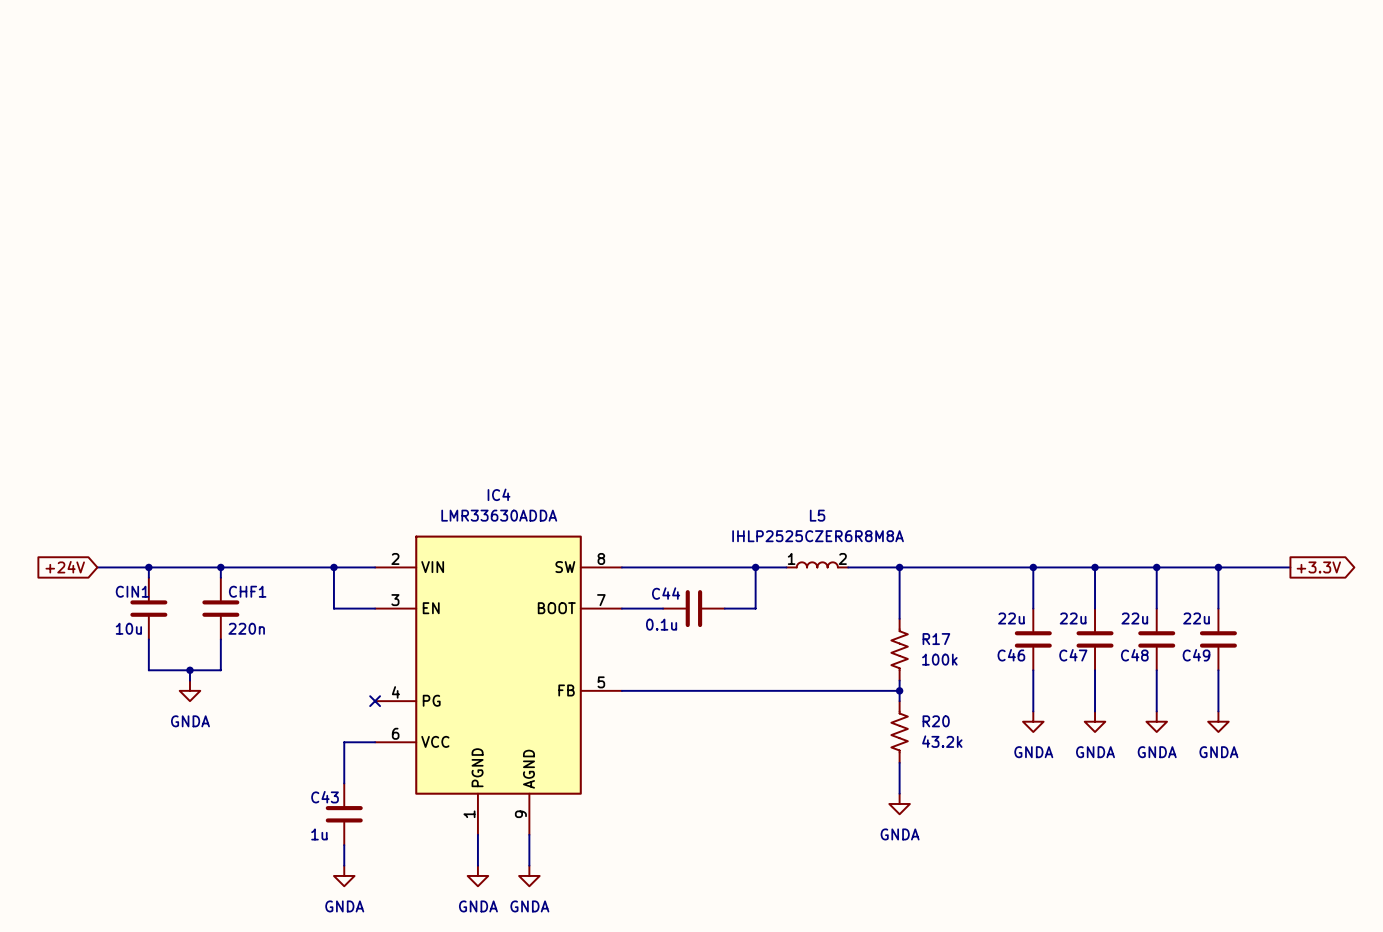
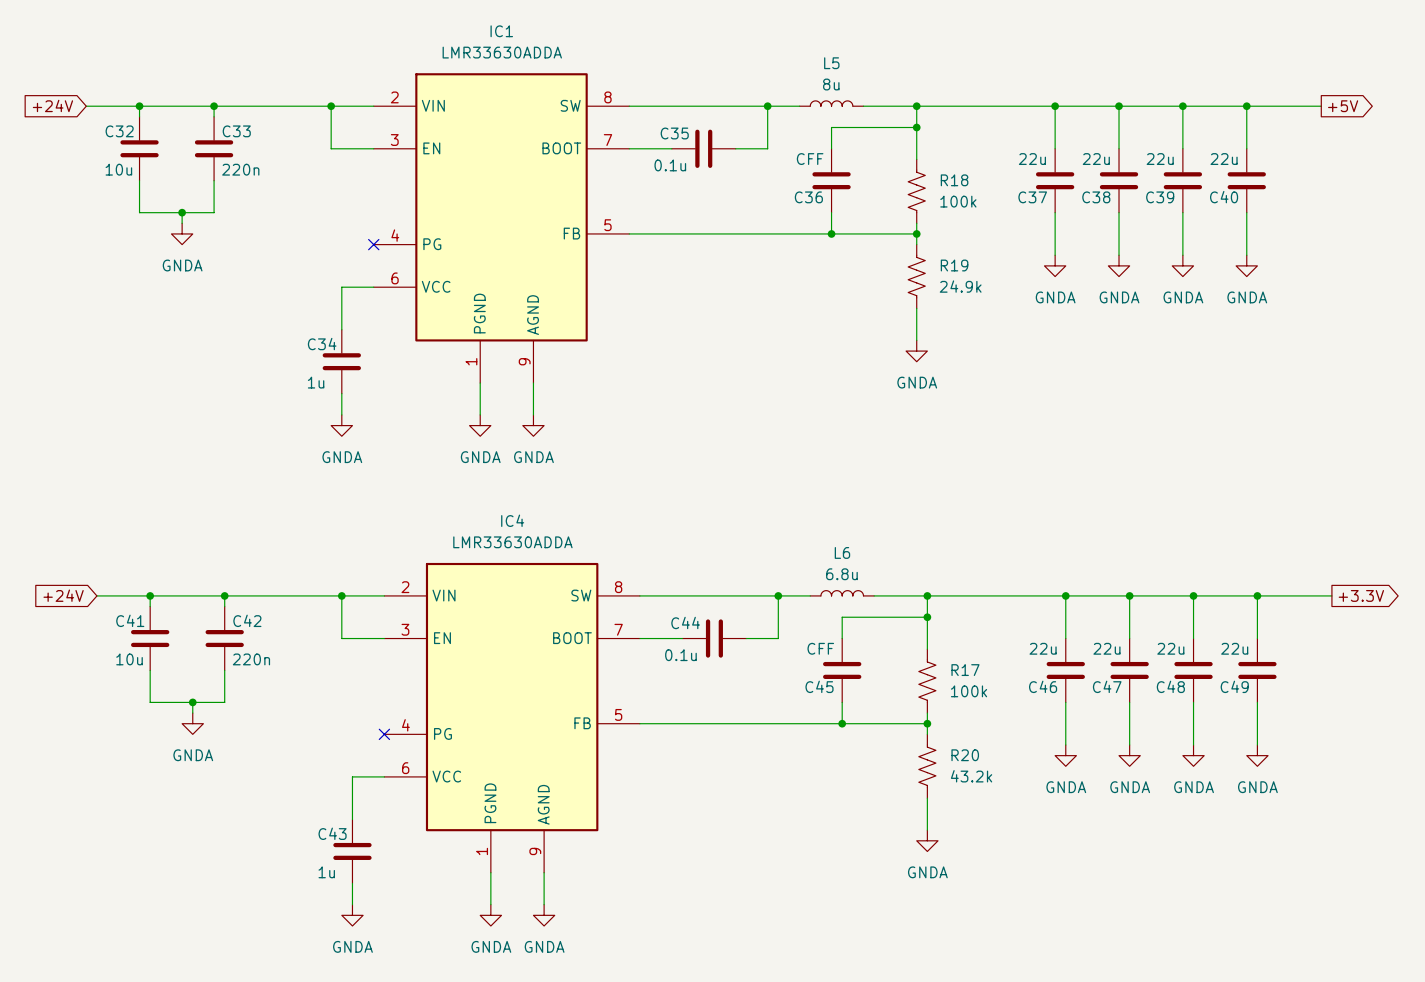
global label: none -> +24V (52, 105)
wire: none -> (86, 106) (373, 106)
wire: none -> (139, 106) (139, 116)
junction: none -> (139, 106)
wire: none -> (214, 106) (214, 116)
junction: none -> (214, 106)
wire: none -> (331, 106) (331, 148) (373, 148)
junction: none -> (331, 106)
wire: none -> (629, 106) (799, 106)
wire: none -> (767, 106) (767, 148) (735, 148)
junction: none -> (767, 106)
wire: none -> (863, 106) (1321, 106)
wire: none -> (916, 106) (916, 159)
junction: none -> (916, 106)
wire: none -> (1055, 106) (1055, 148)
junction: none -> (1055, 106)
wire: none -> (1119, 106) (1119, 148)
junction: none -> (1119, 106)
wire: none -> (1182, 106) (1182, 148)
junction: none -> (1182, 106)
wire: none -> (1246, 106) (1246, 148)
junction: none -> (1246, 106)
global label: none -> +5V (1343, 106)
wire: none -> (916, 127) (831, 127) (831, 148)
junction: none -> (916, 127)
C32: none -> 10u (139, 148)
C33: none -> 220n (214, 148)
wire: none -> (629, 148) (671, 148)
C35: none -> 0.1u (703, 148)
wire: none -> (139, 180) (139, 212) (214, 212) (214, 180)
C36: none -> CFF (831, 180)
C37: none -> 22u (1055, 180)
C38: none -> 22u (1119, 180)
C39: none -> 22u (1182, 180)
C40: none -> 22u (1246, 180)
R18: none -> 100k (916, 191)
wire: none -> (182, 212) (182, 223)
junction: none -> (182, 212)
wire: none -> (831, 212) (831, 233)
wire: none -> (1055, 212) (1055, 255)
wire: none -> (1119, 212) (1119, 255)
wire: none -> (1182, 212) (1182, 255)
wire: none -> (1246, 212) (1246, 255)
wire: none -> (916, 223) (916, 244)
IC1: none -> LMR33630ADDA (501, 228)
power symbol: none -> GNDA (182, 233)
wire: none -> (629, 233) (916, 233)
junction: none -> (831, 233)
junction: none -> (916, 233)
no-connect mark: none -> (373, 244)
power symbol: none -> GNDA (1055, 265)
power symbol: none -> GNDA (1119, 265)
power symbol: none -> GNDA (1182, 265)
power symbol: none -> GNDA (1246, 265)
R19: none -> 24.9k (916, 276)
wire: none -> (373, 287) (341, 287) (341, 329)
wire: none -> (916, 308) (916, 340)
power symbol: none -> GNDA (916, 351)
C34: none -> 1u (341, 361)
wire: none -> (480, 383) (480, 414)
wire: none -> (533, 383) (533, 414)
wire: none -> (341, 393) (341, 414)
power symbol: none -> GNDA (341, 425)
power symbol: none -> GNDA (480, 425)
power symbol: none -> GNDA (533, 425)
L5 name position: L5 (817, 515) -> L5 (831, 63)
L5 value: IHLP2525CZER6R8M8A (818, 536) -> 8u (831, 84)
L5 pin number: 1 (791, 558) -> none
L5 pin number: 2 (842, 558) -> none
L5 position: (817, 564) -> (831, 103)
L6: none -> 6.8u (842, 593)
wire: none -> (927, 617) (842, 617) (842, 638)
junction: none -> (927, 617)
CIN1 name: CIN1 (132, 591) -> C41 (130, 620)
CHF1 name: CHF1 (247, 591) -> C42 (247, 620)
C45: none -> CFF (842, 670)
wire: none -> (842, 702) (842, 723)
junction: none -> (842, 723)

